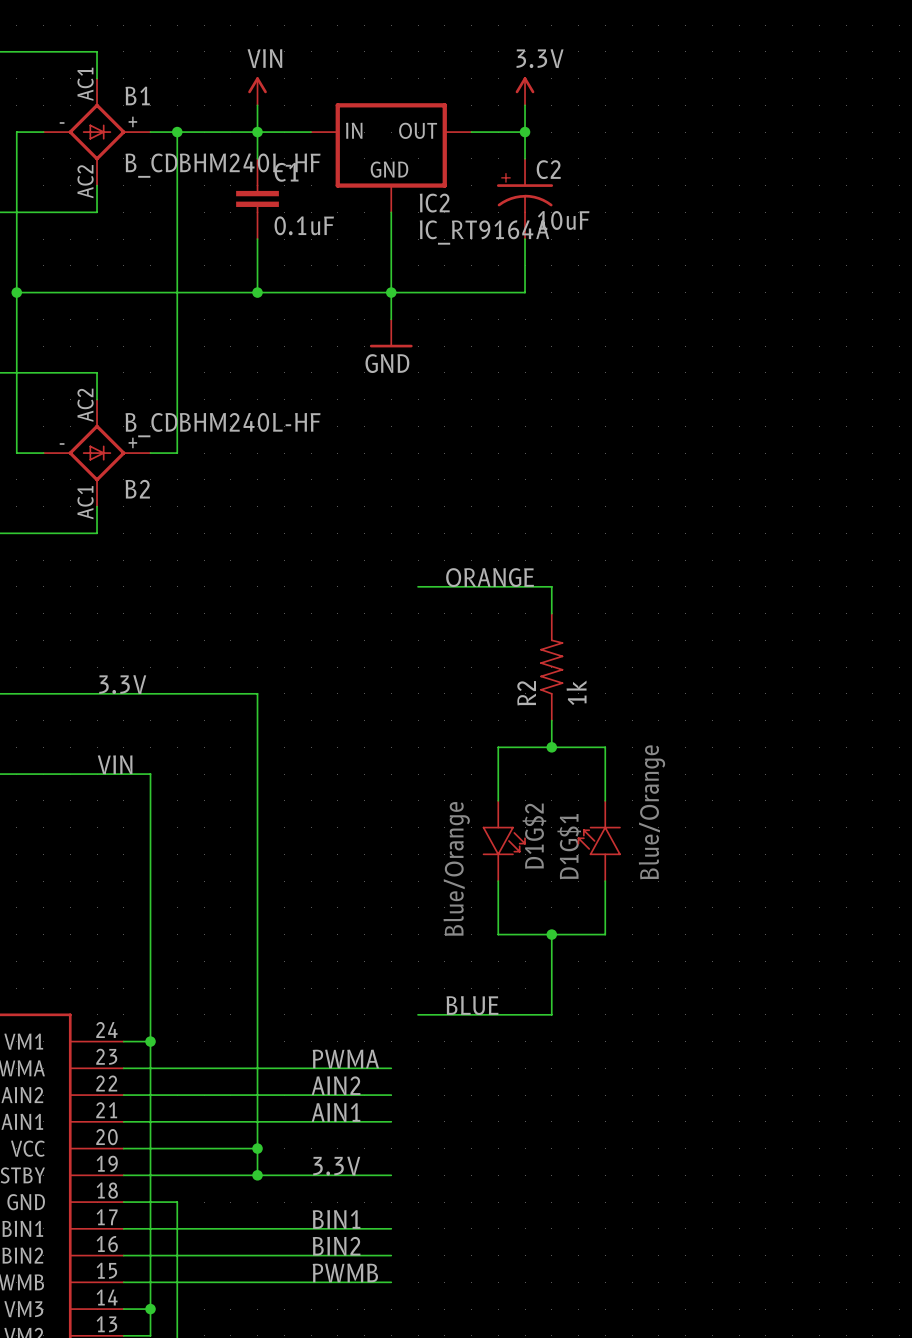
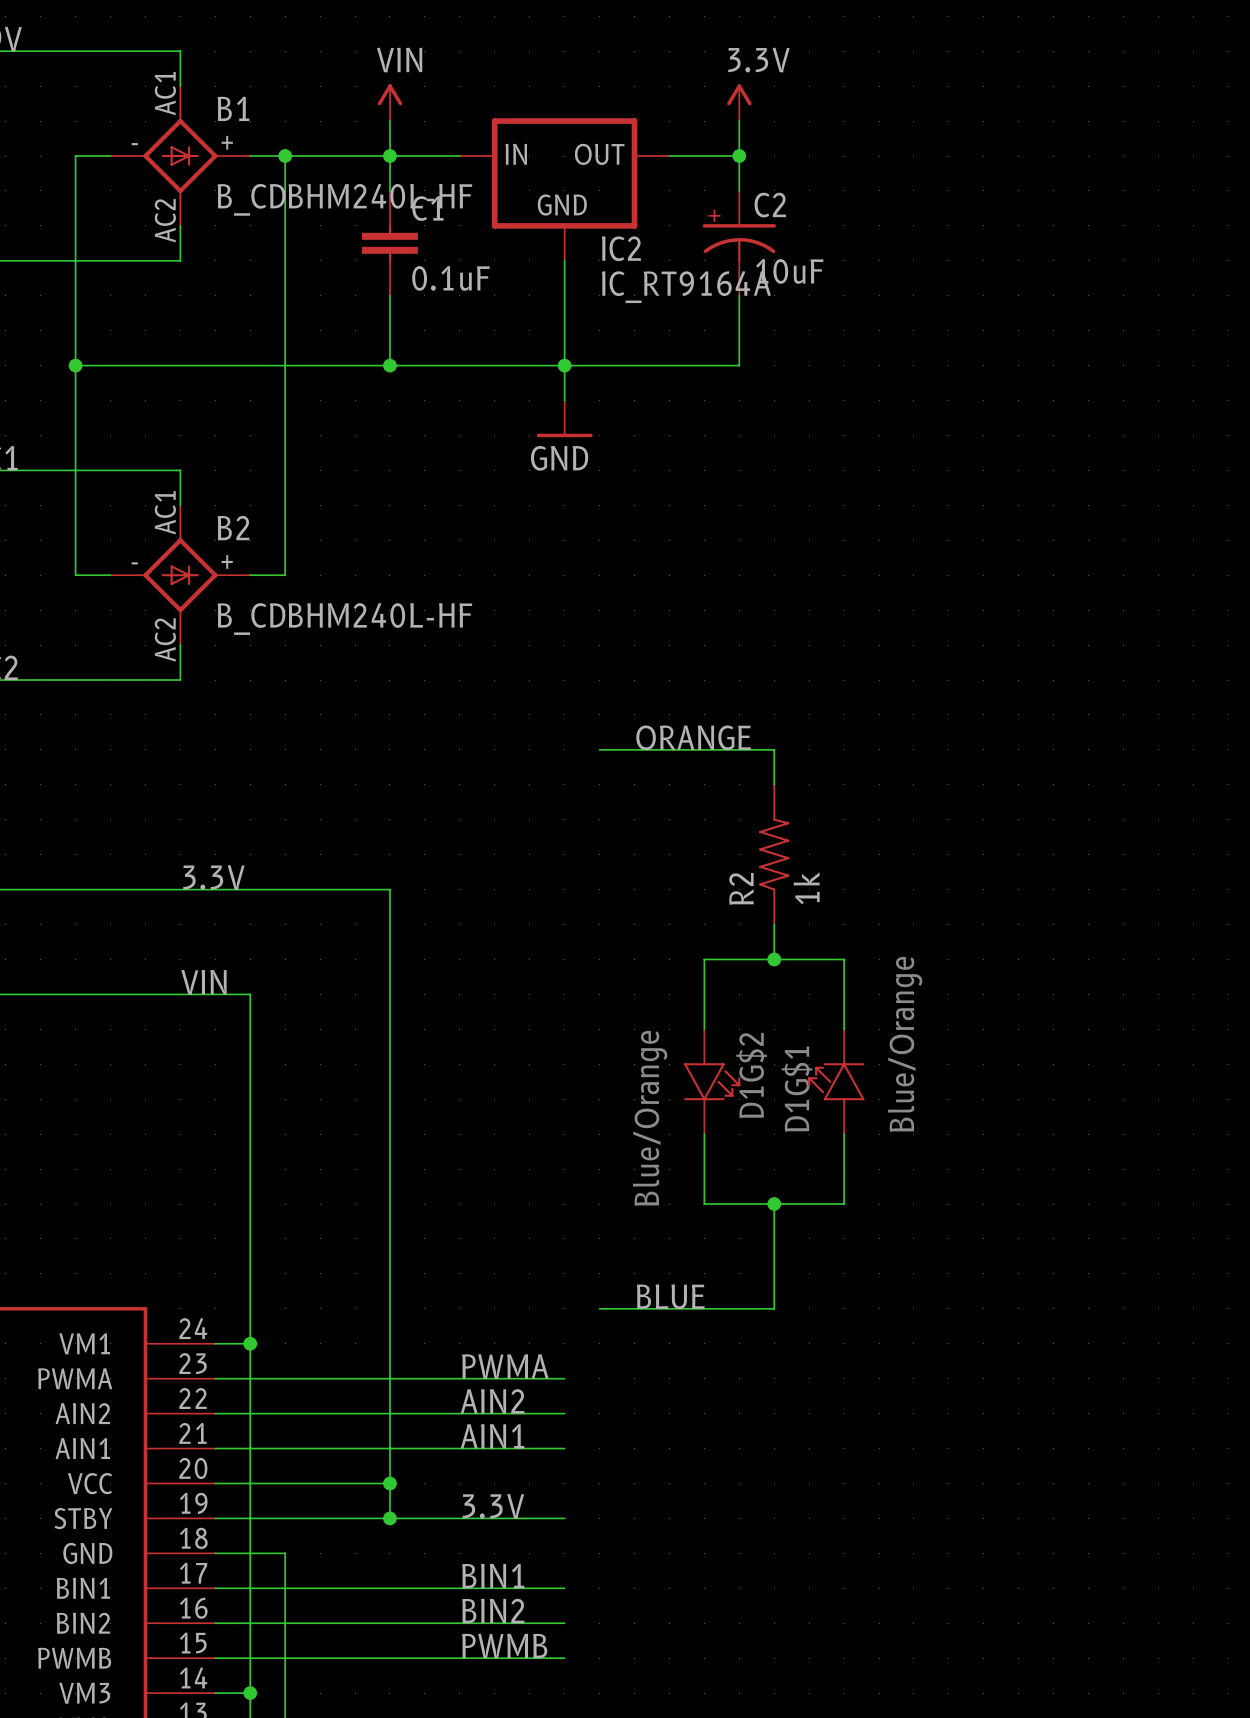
B2 flip: as is (97, 453) -> up-down (180, 575)

